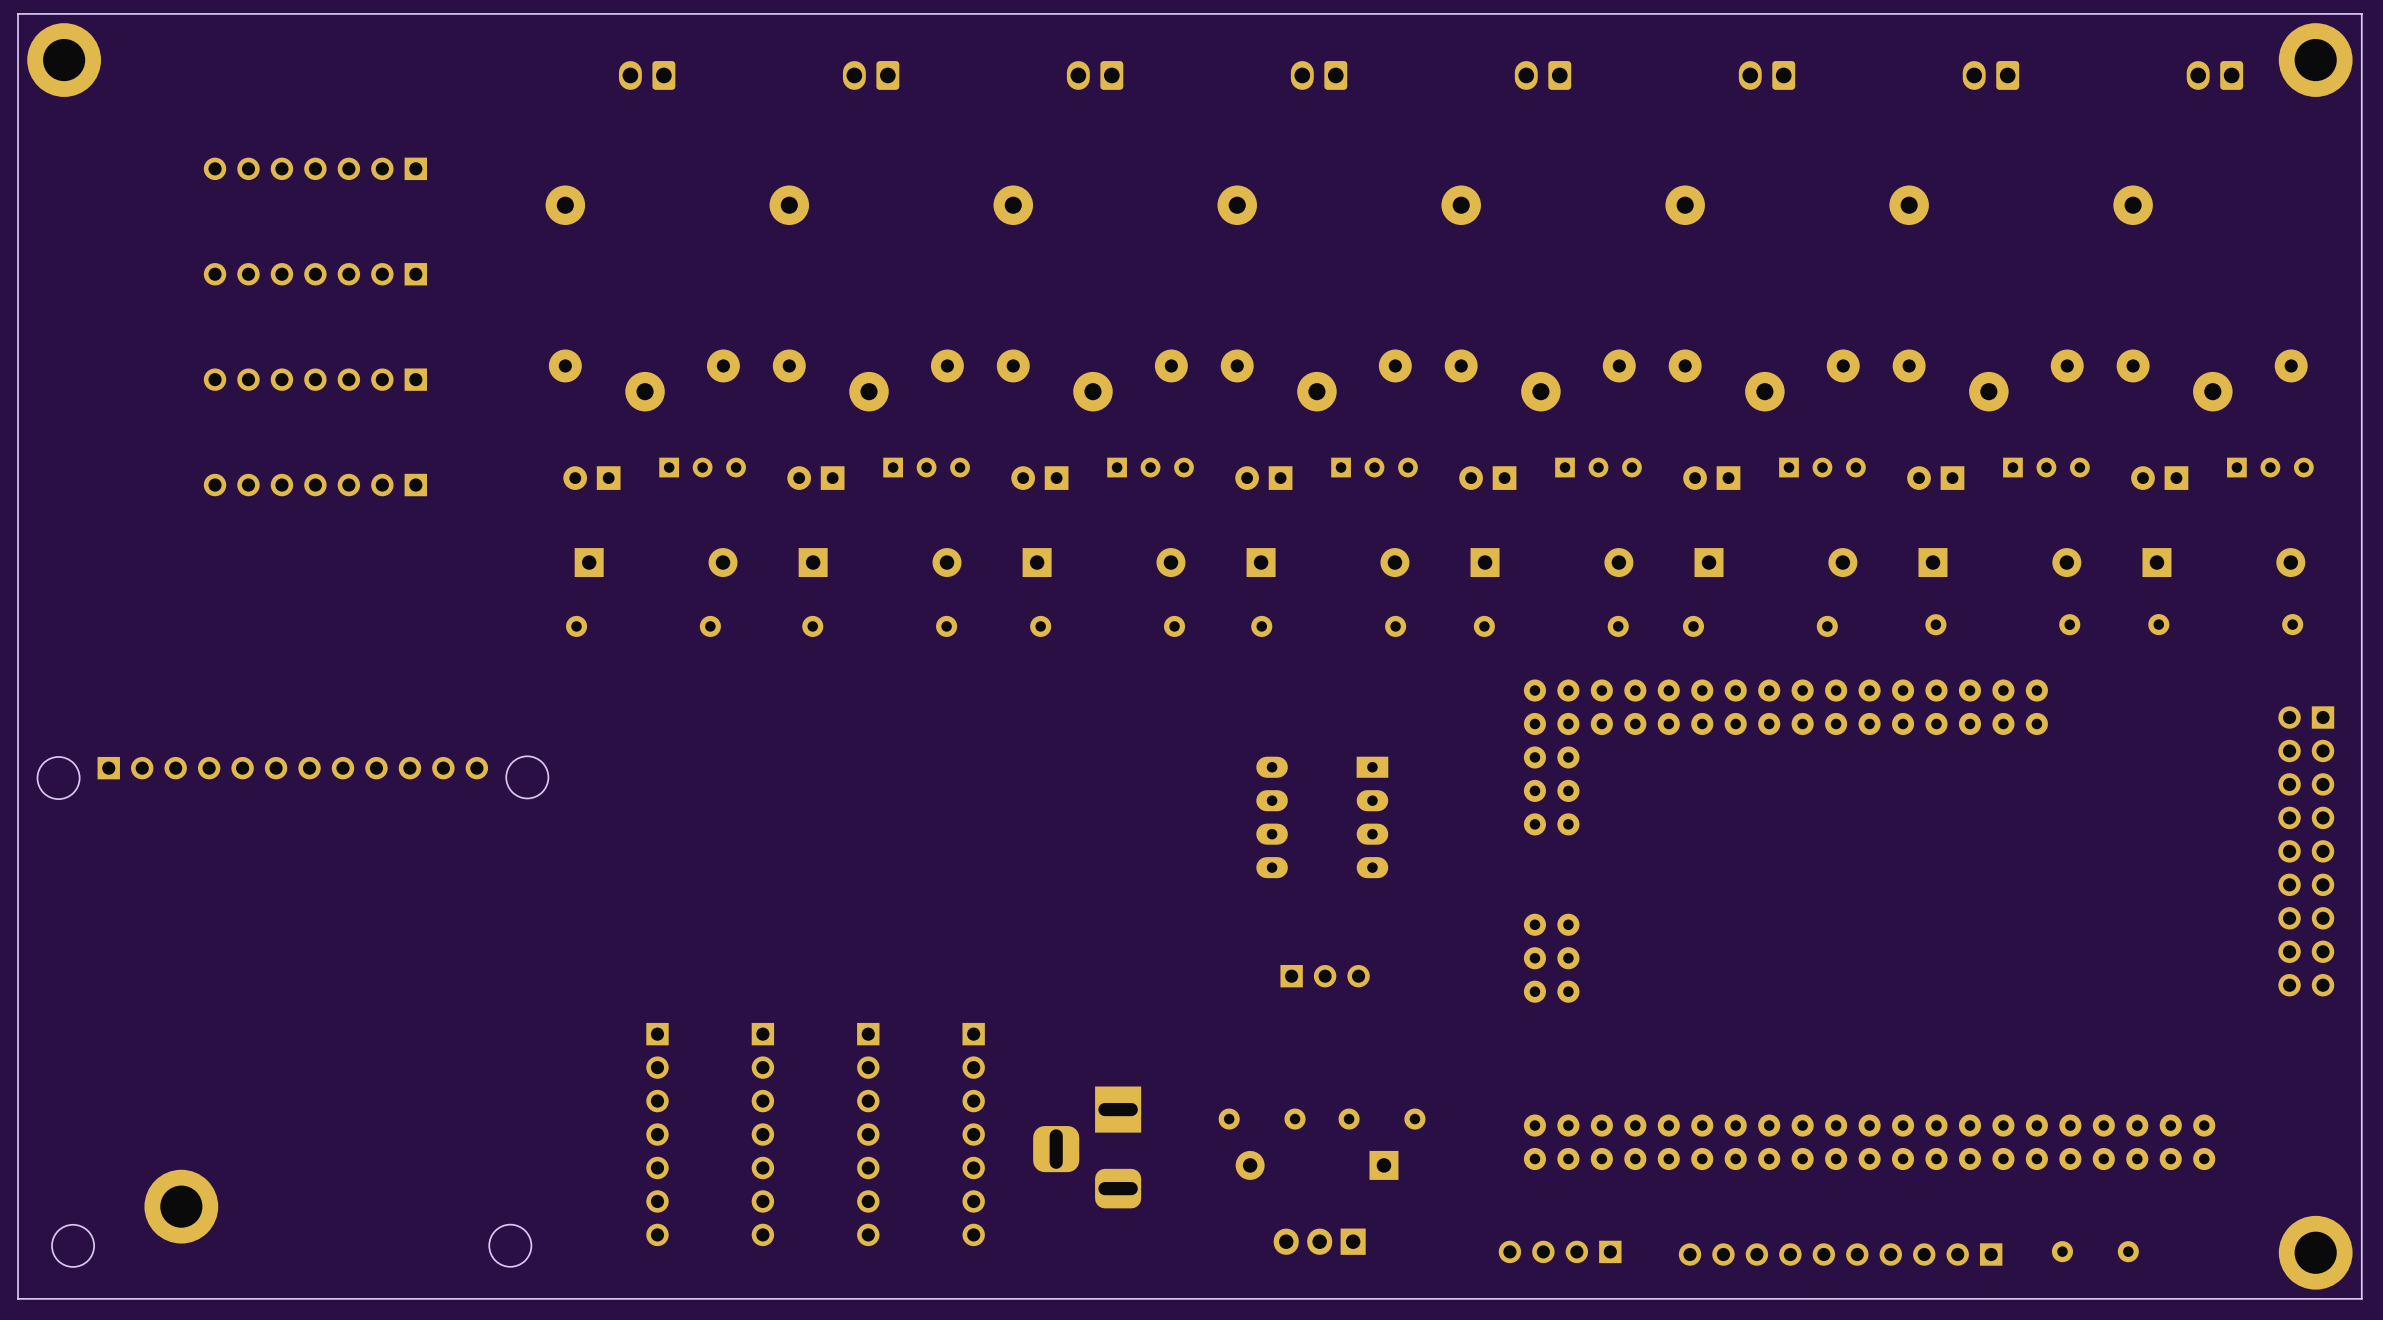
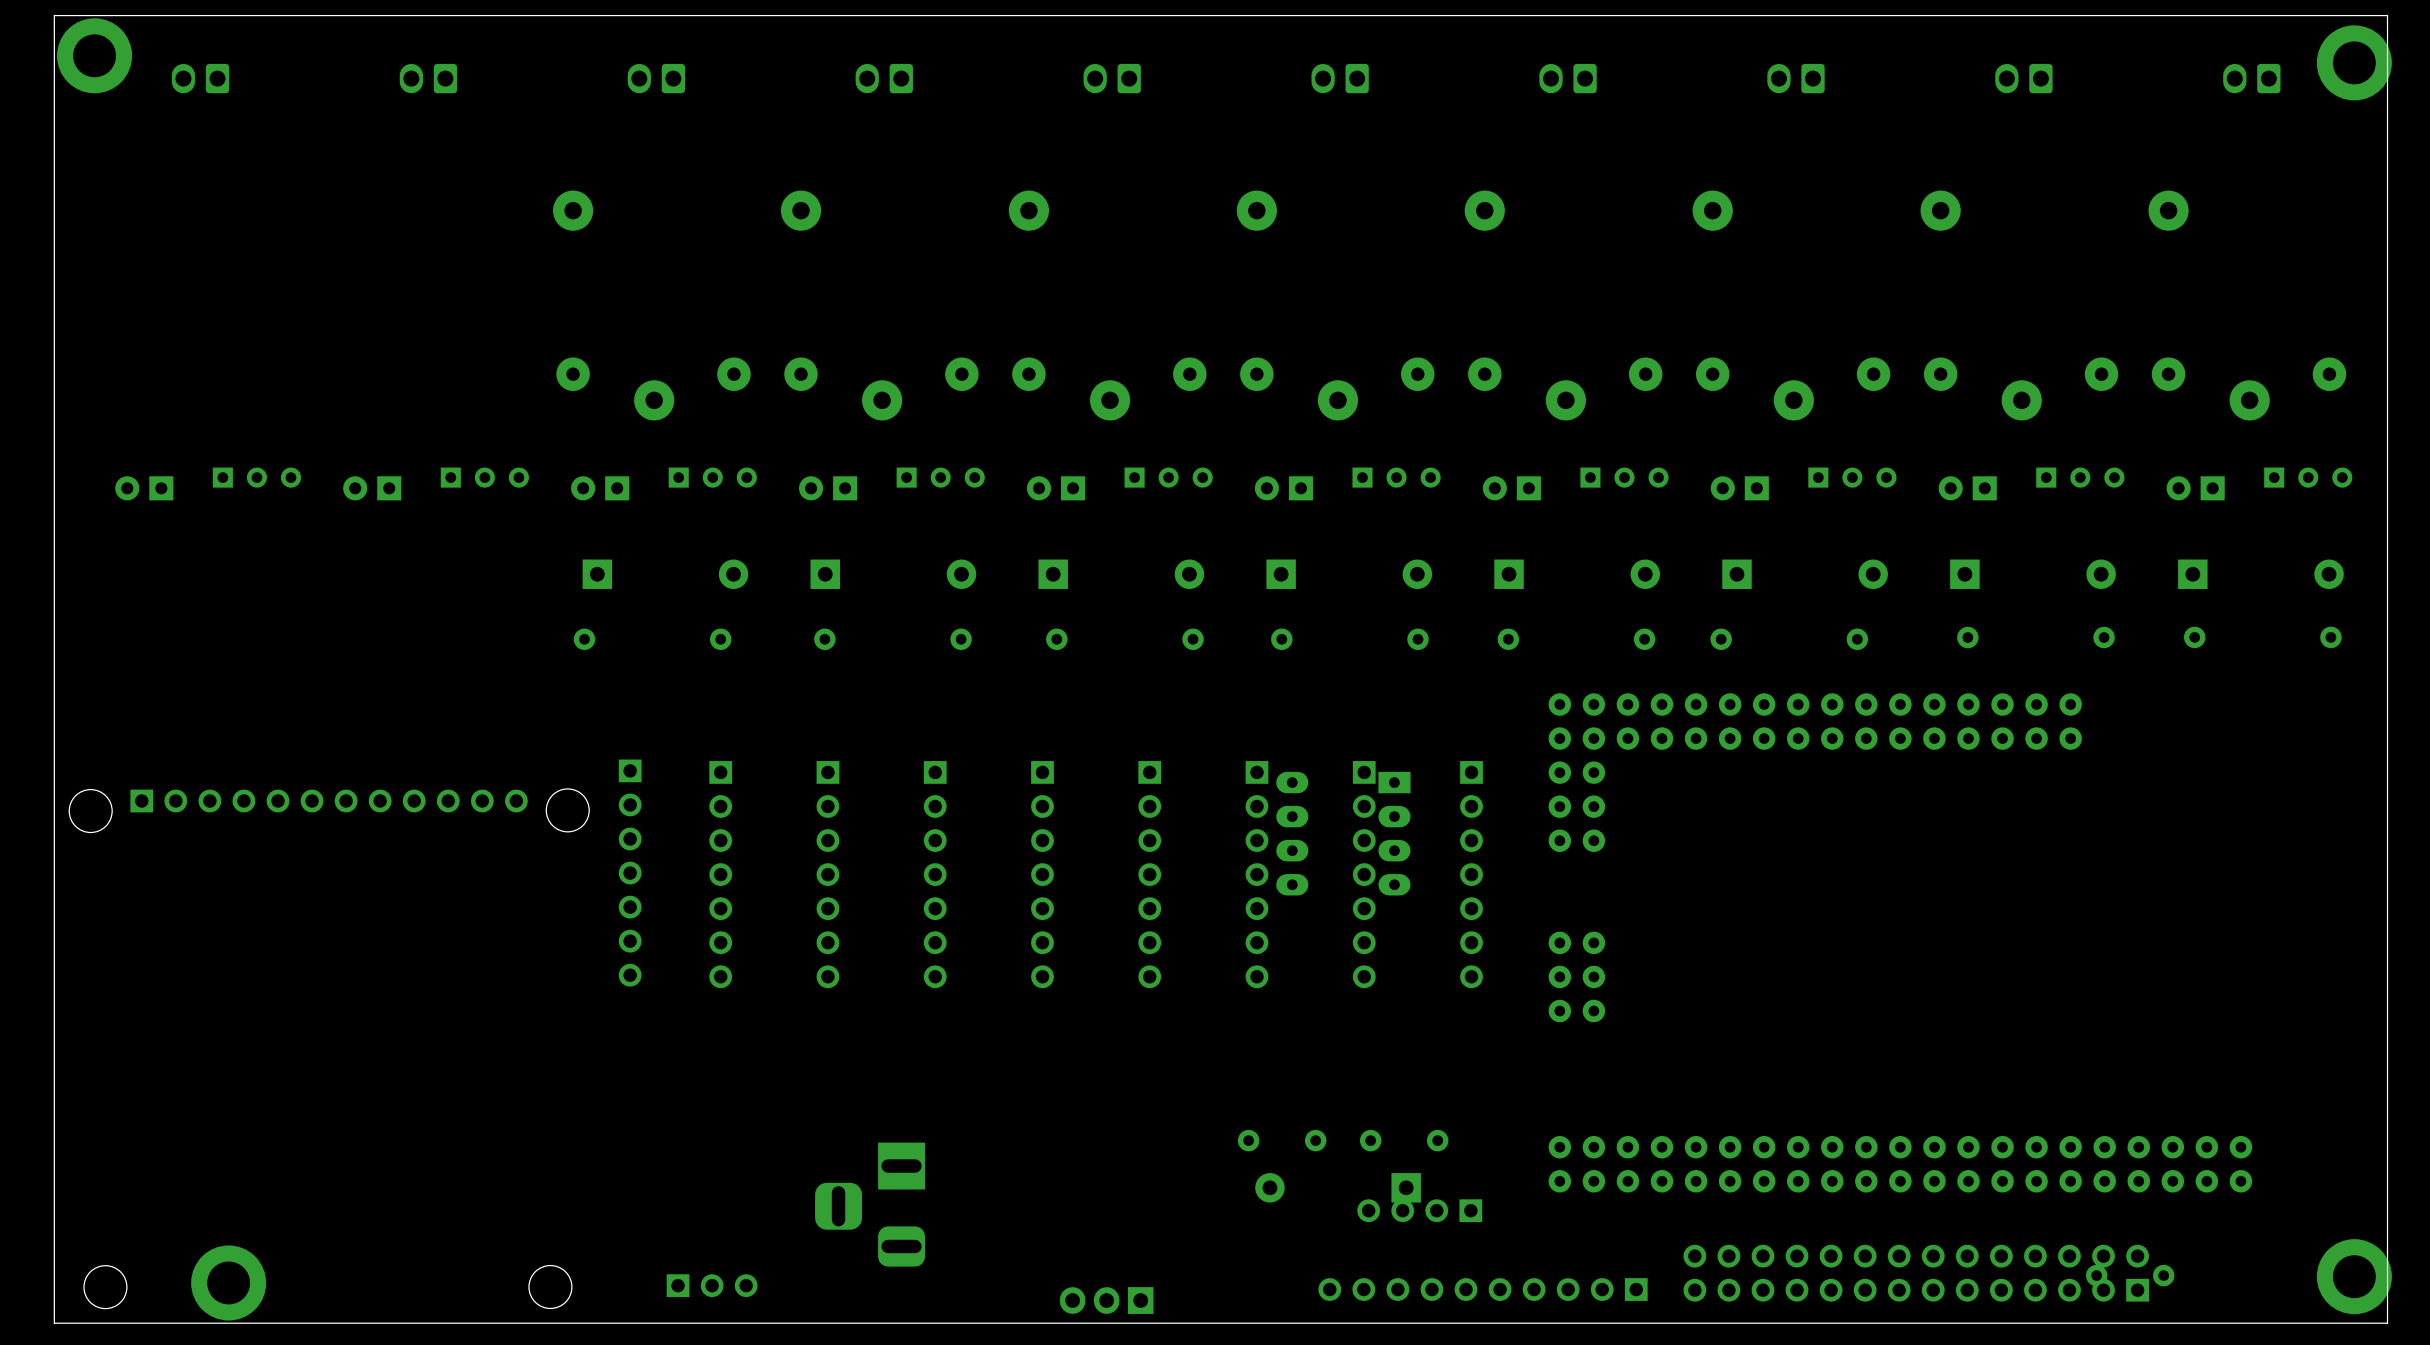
board edge: (2361, 13) (2361, 1298) (18, 1298) (18, 13) (2361, 13) -> (2387, 15) (2387, 1323) (54, 1323) (54, 15) (2387, 15)
part position: (64, 60) -> (94, 55)
part: none -> (200, 78)
part: none -> (428, 78)
part: (315, 168) -> none
part: (315, 274) -> none
part: (315, 379) -> none
part: none -> (256, 477)
part: none -> (484, 477)
part: none -> (144, 488)
part: none -> (372, 488)
part: (315, 485) -> none
part position: (292, 768) -> (329, 800)
round board edge position: (527, 777) -> (567, 810)
round board edge position: (58, 778) -> (90, 811)
part: (2306, 851) -> none
part: none -> (630, 873)
part: none -> (720, 874)
part: none -> (827, 874)
part: none -> (935, 874)
part: none -> (1042, 874)
part: none -> (1149, 874)
part: none -> (1257, 874)
part: none -> (1364, 874)
part: none -> (1471, 874)
part: (1325, 976) -> none
part: (657, 1134) -> none
part: (762, 1134) -> none
part: (868, 1134) -> none
part: (973, 1134) -> none
part position: (1087, 1147) -> (870, 1204)
part position: (181, 1206) -> (228, 1282)
part position: (1319, 1241) -> (1106, 1300)
round board edge position: (73, 1245) -> (105, 1287)
round board edge position: (510, 1245) -> (550, 1287)
part: none -> (1916, 1273)
part position: (1560, 1251) -> (1419, 1210)
part: (1840, 1254) -> none
part: none -> (712, 1285)
part: none -> (1483, 1289)

